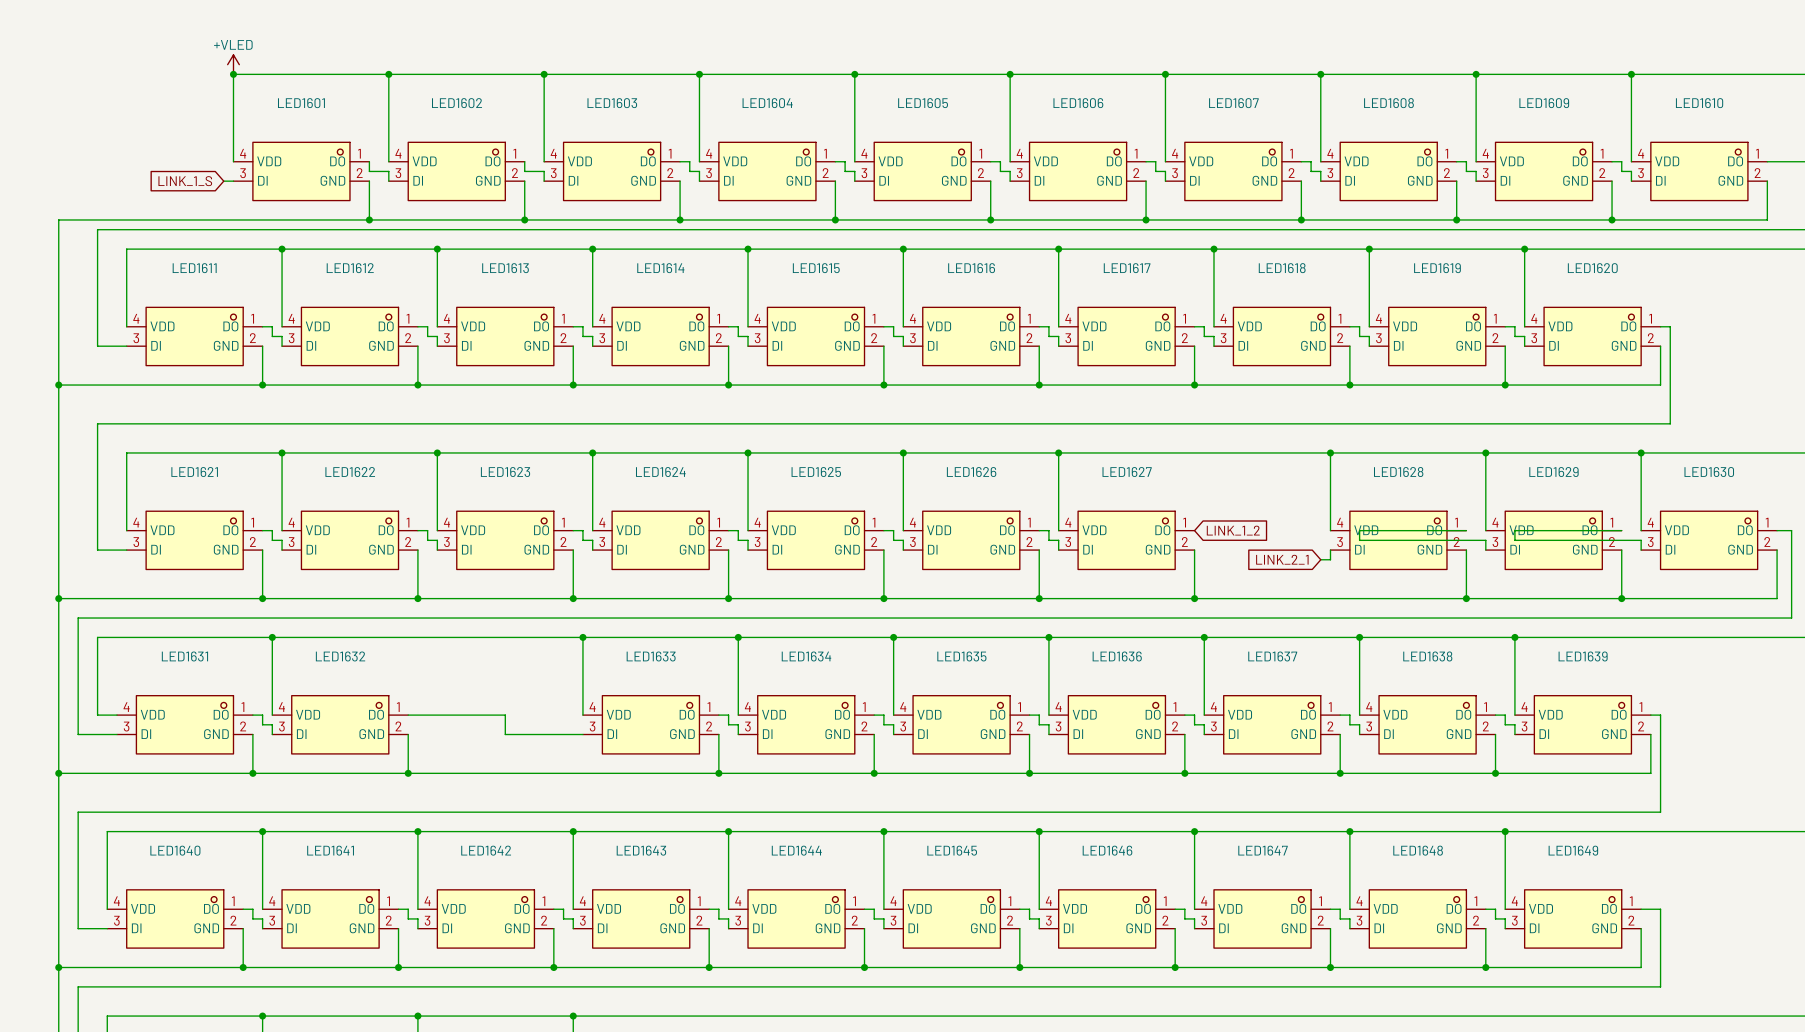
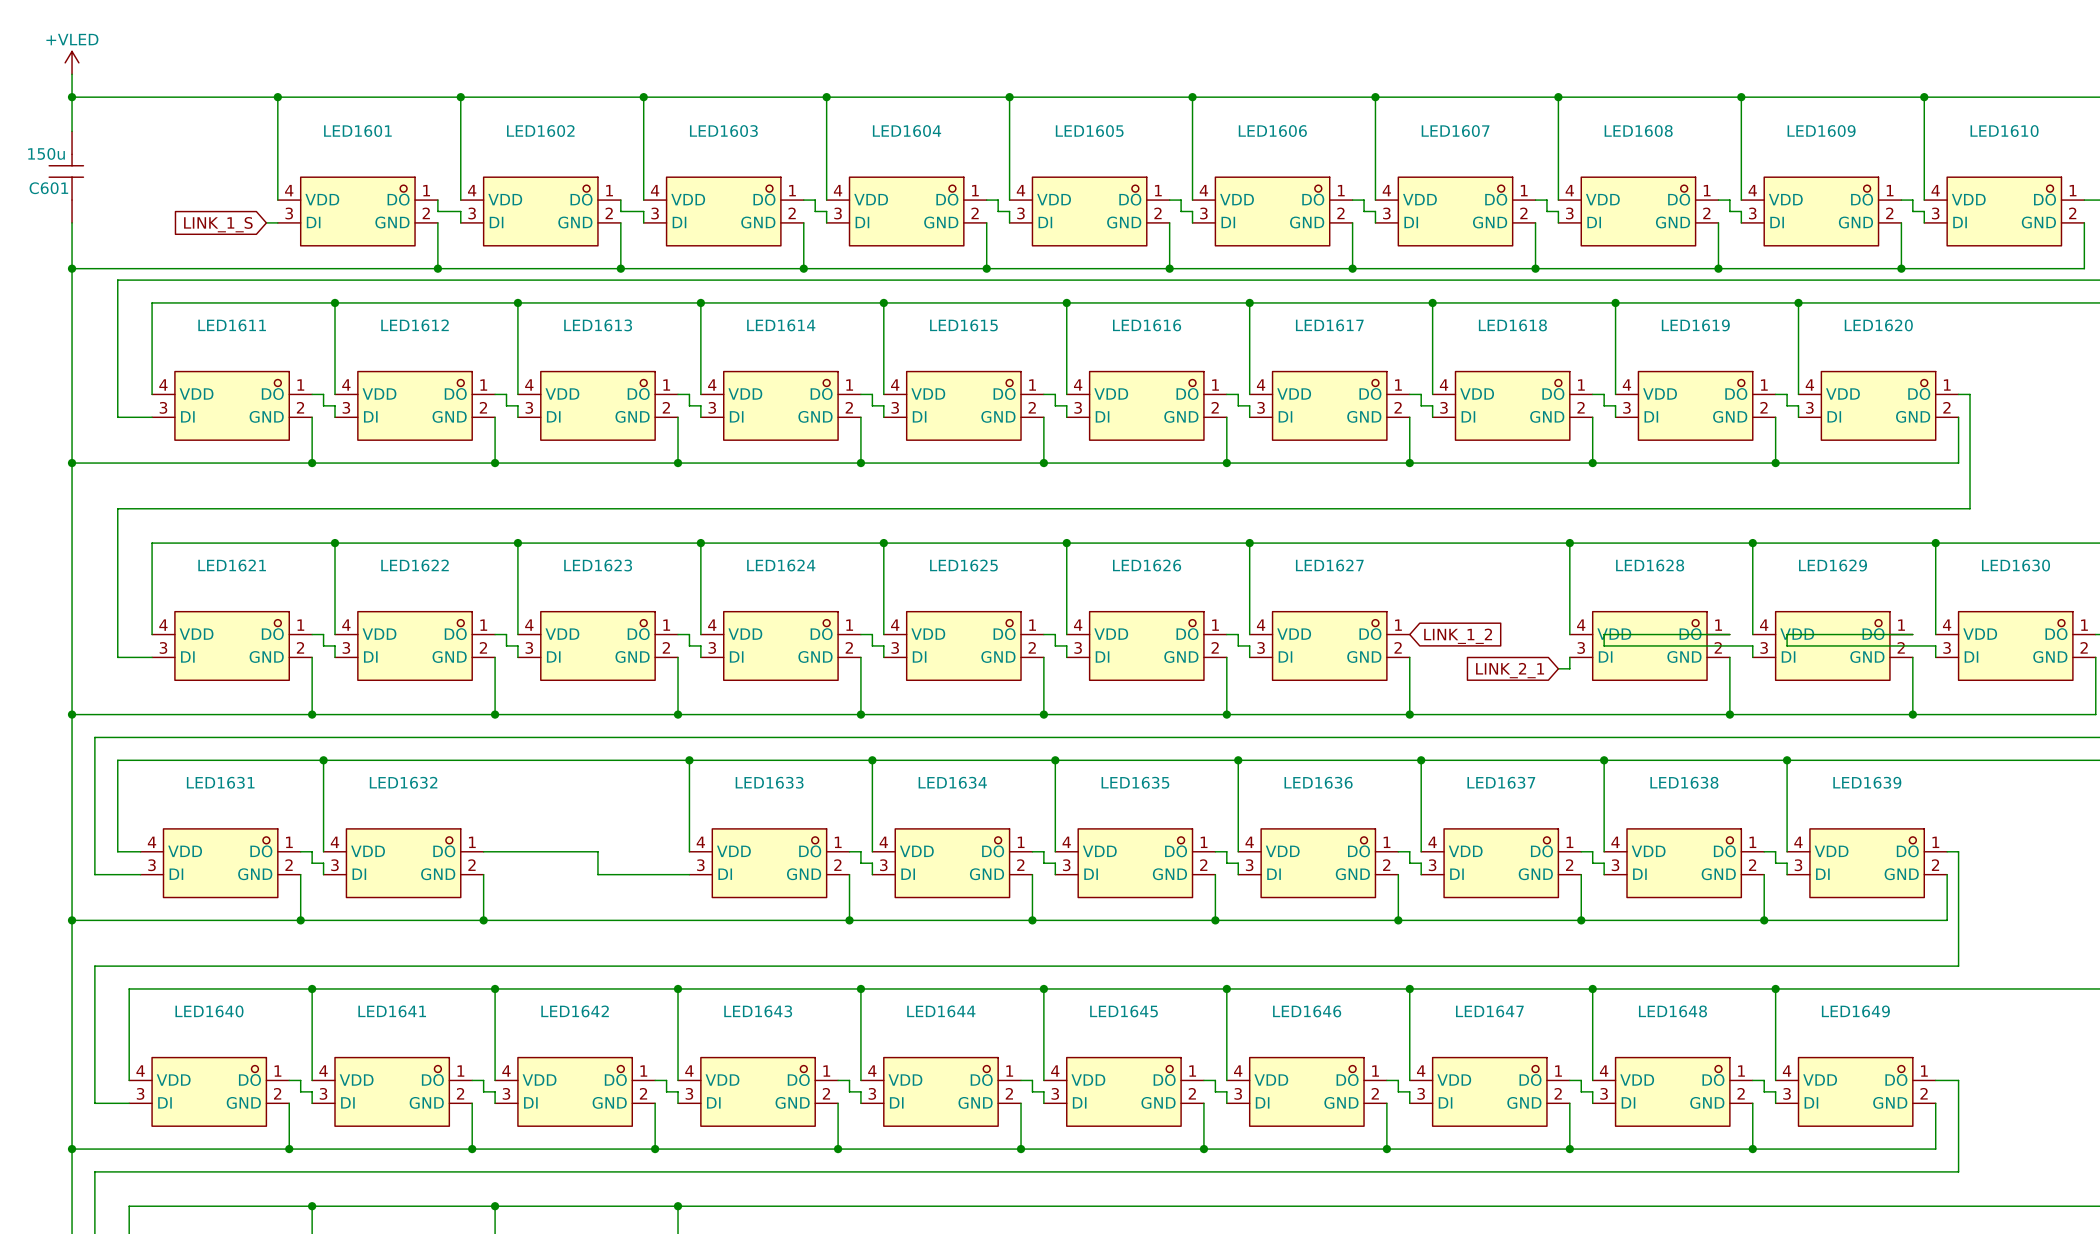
wire: none -> (72, 74) (72, 131)
power symbol position: +VLED (233, 64) -> +VLED (72, 62)
wire: none -> (72, 97) (277, 97)
junction: none -> (72, 97)
C601: none -> 150u (66, 177)
wire: none -> (72, 222) (72, 268)
junction: none -> (72, 268)

